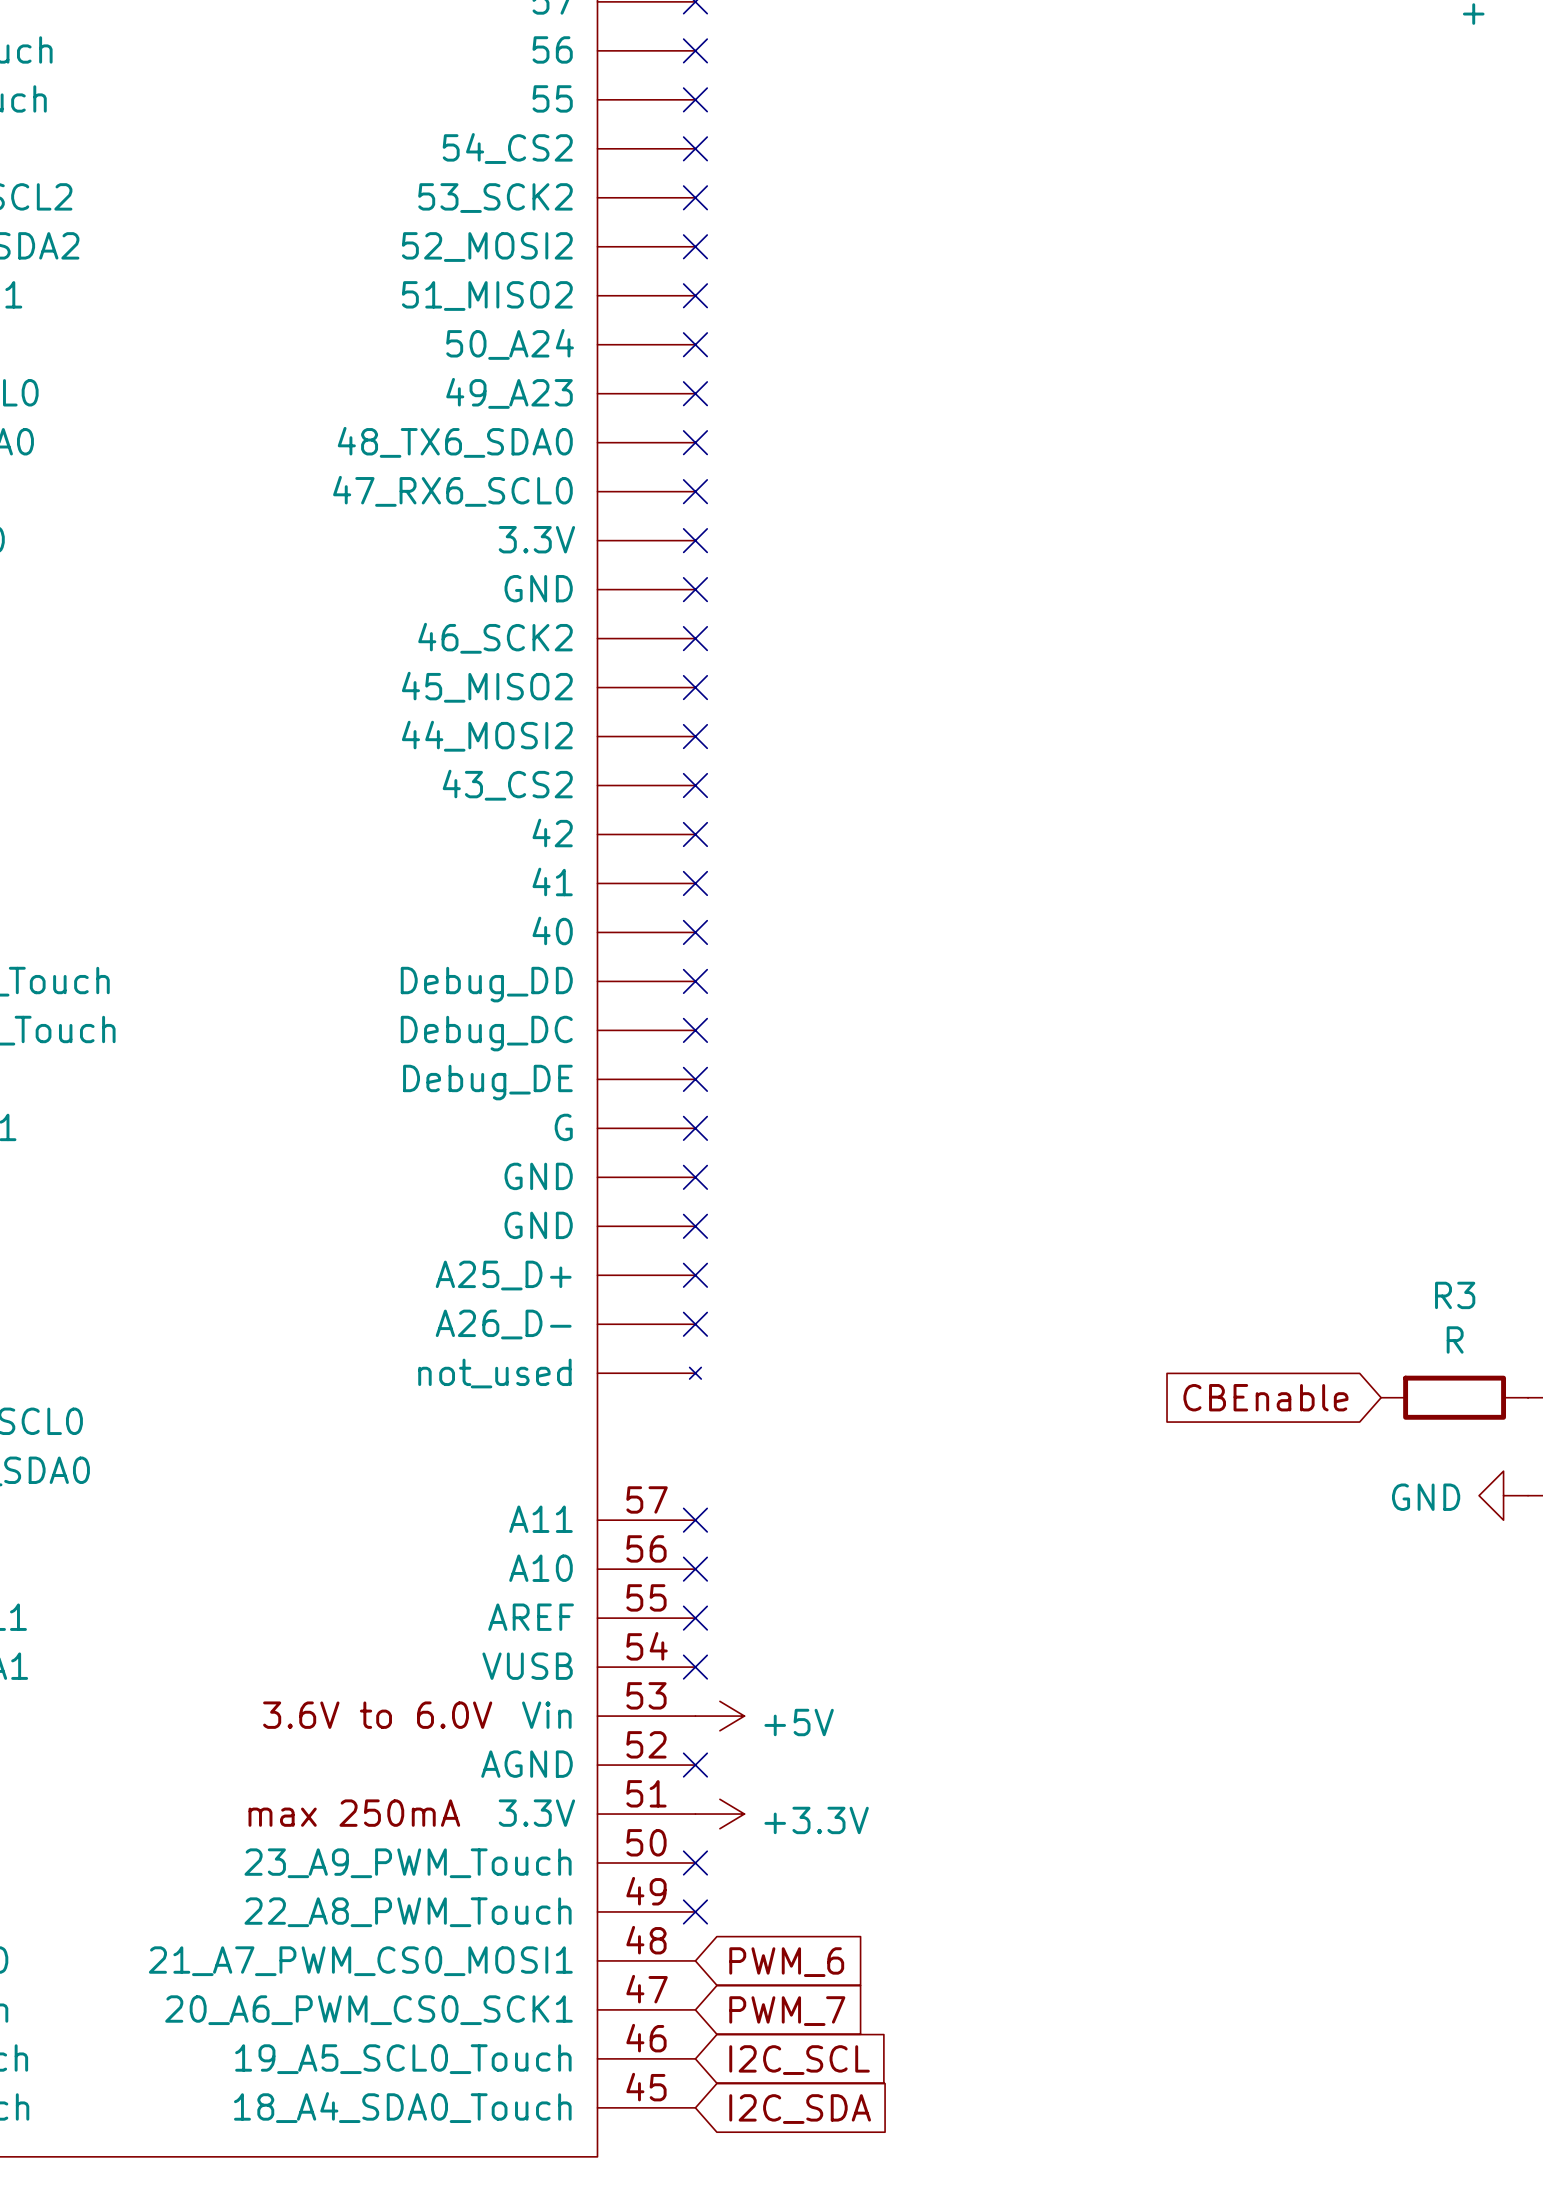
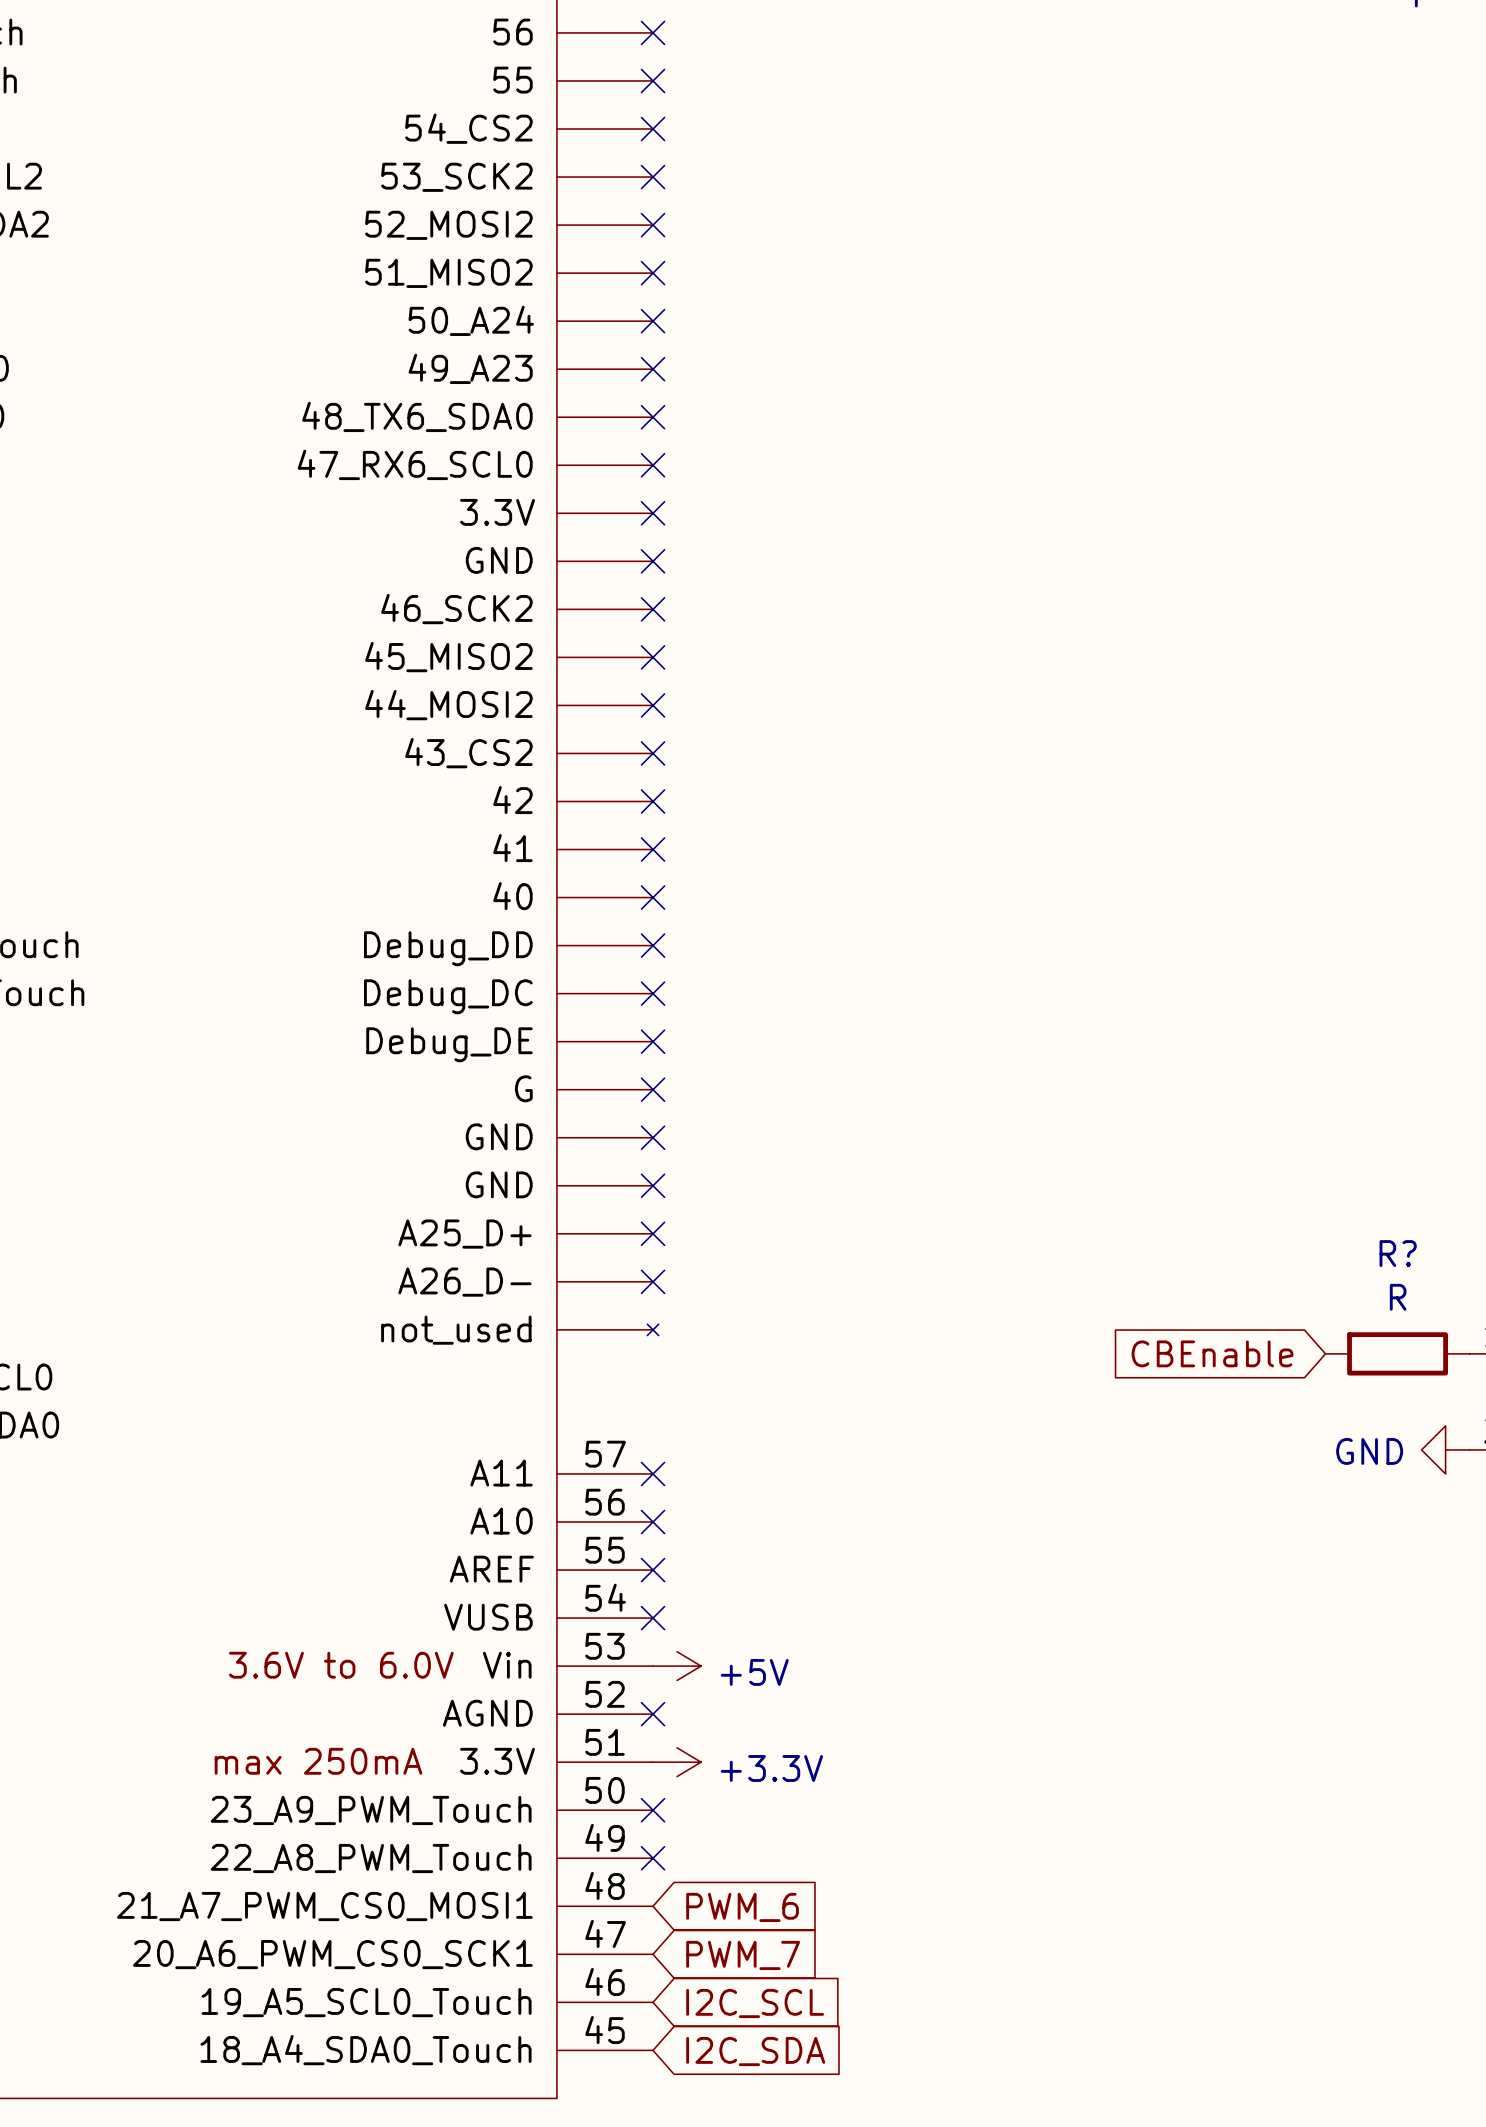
R3 name: R3 (1455, 1295) -> R? (1398, 1253)

